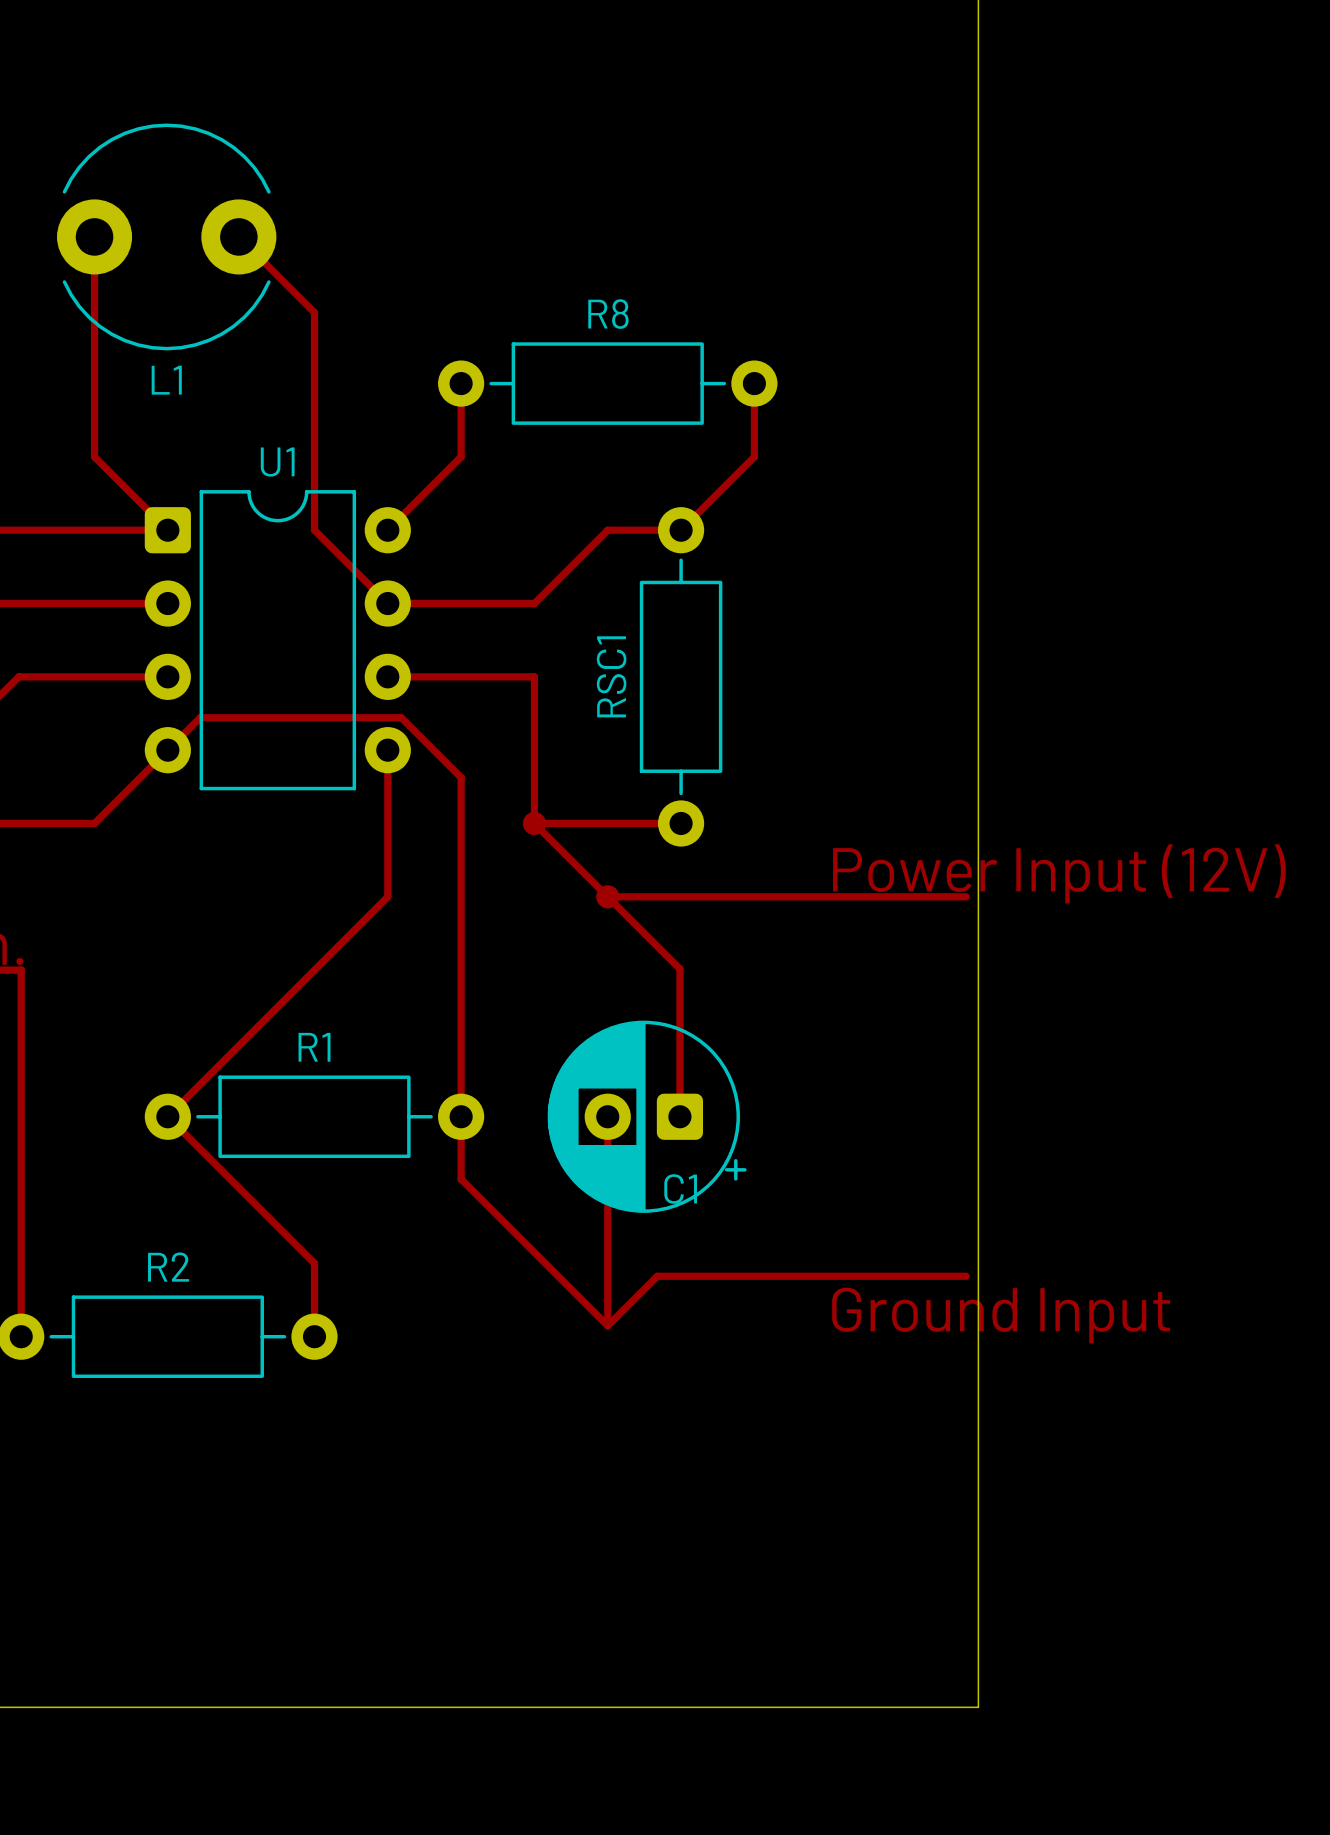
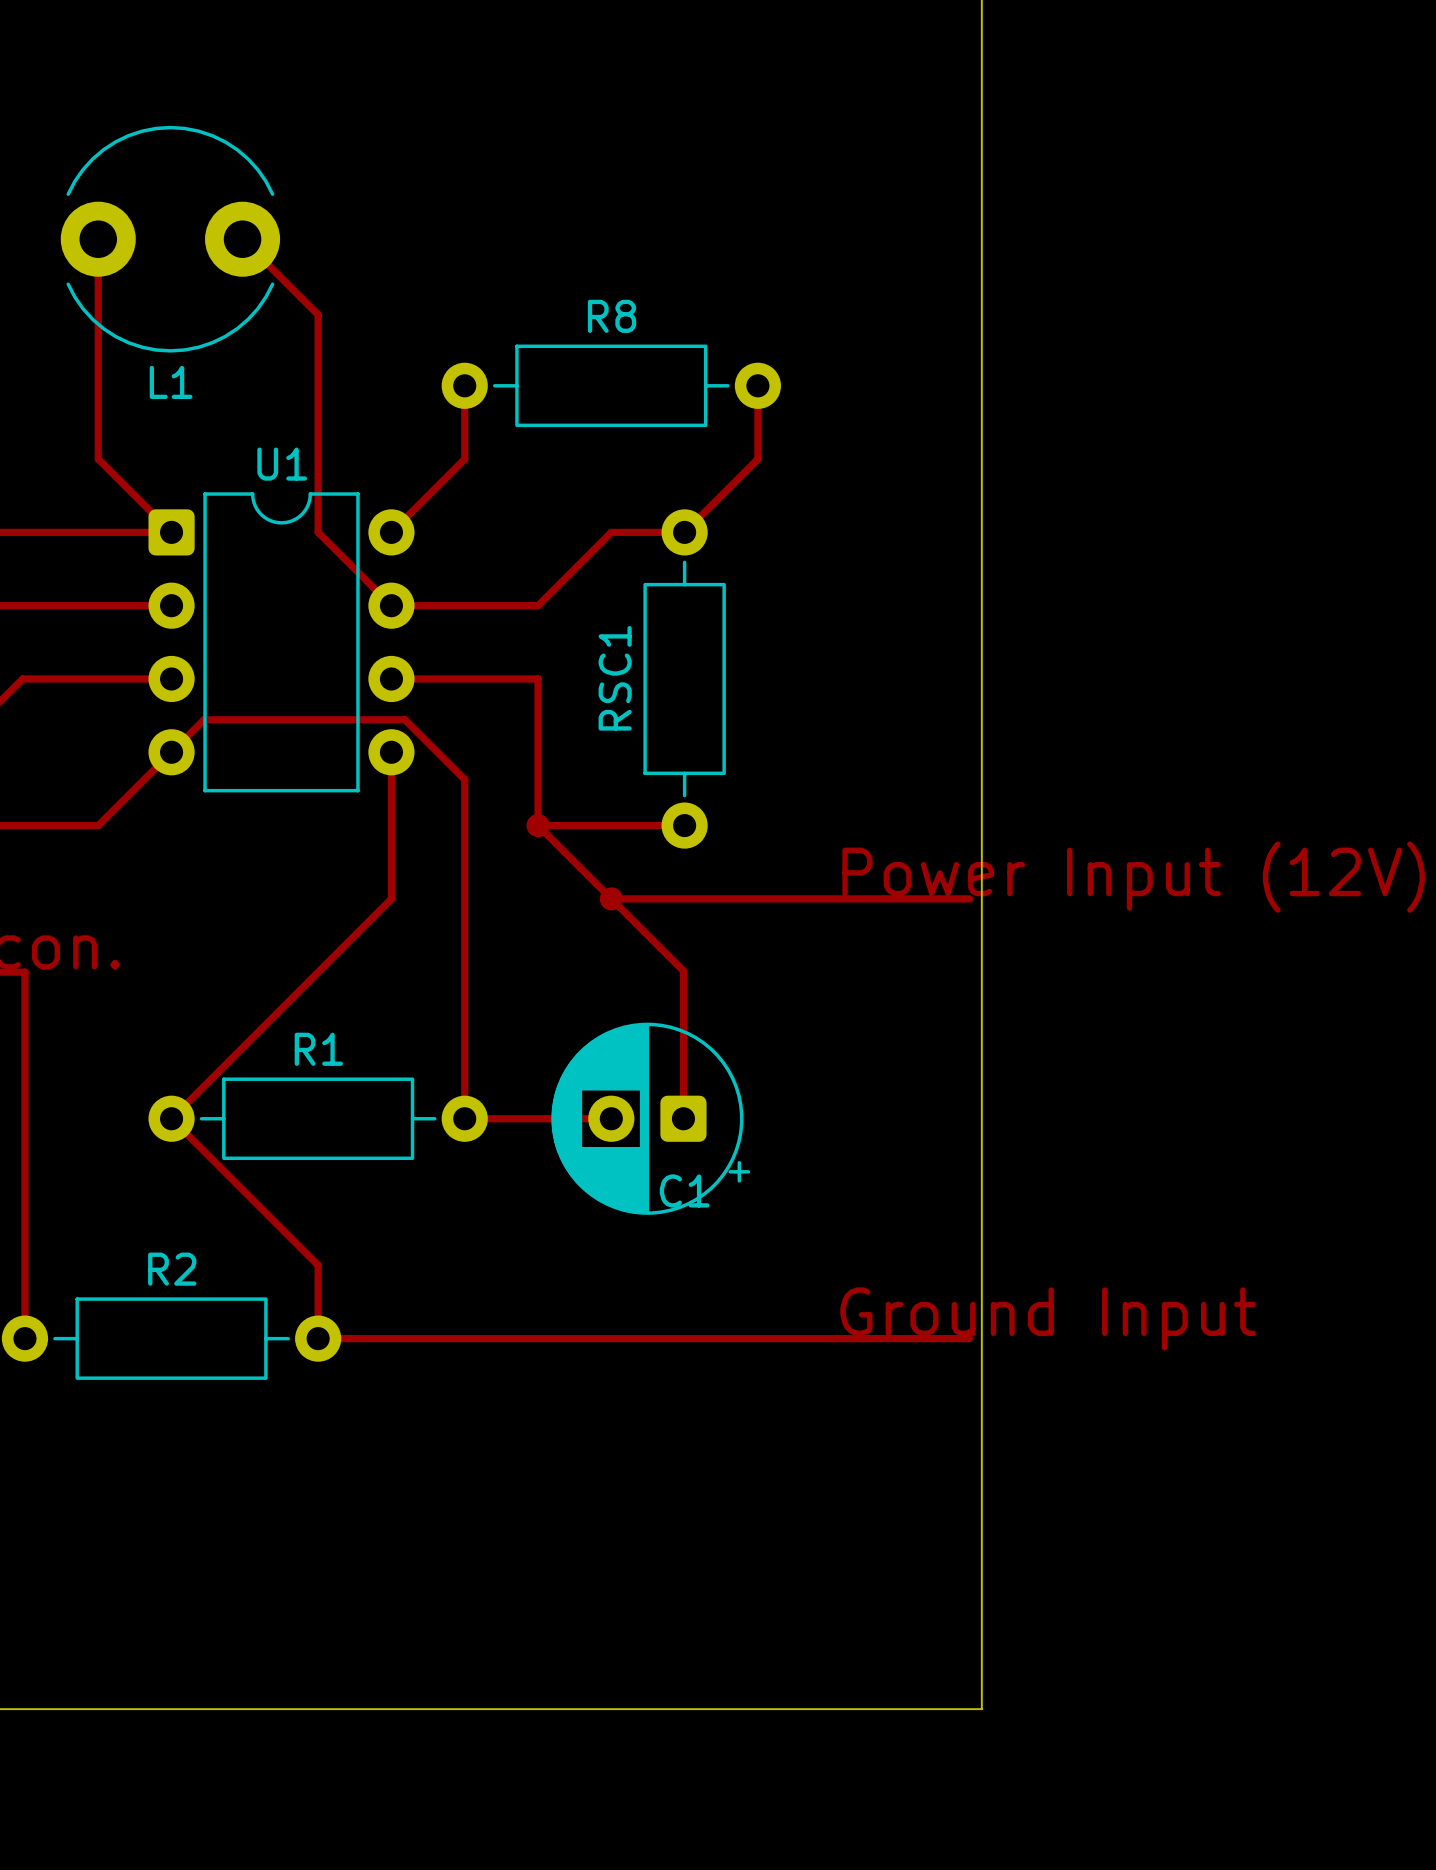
top track: (461, 1116) (461, 1179) (607, 1325) -> (464, 1118) (611, 1118)
top track: (607, 1116) (607, 1325) -> none
top track: (966, 1276) (657, 1276) (607, 1325) -> none
top track: none -> (318, 1338) (969, 1338)

